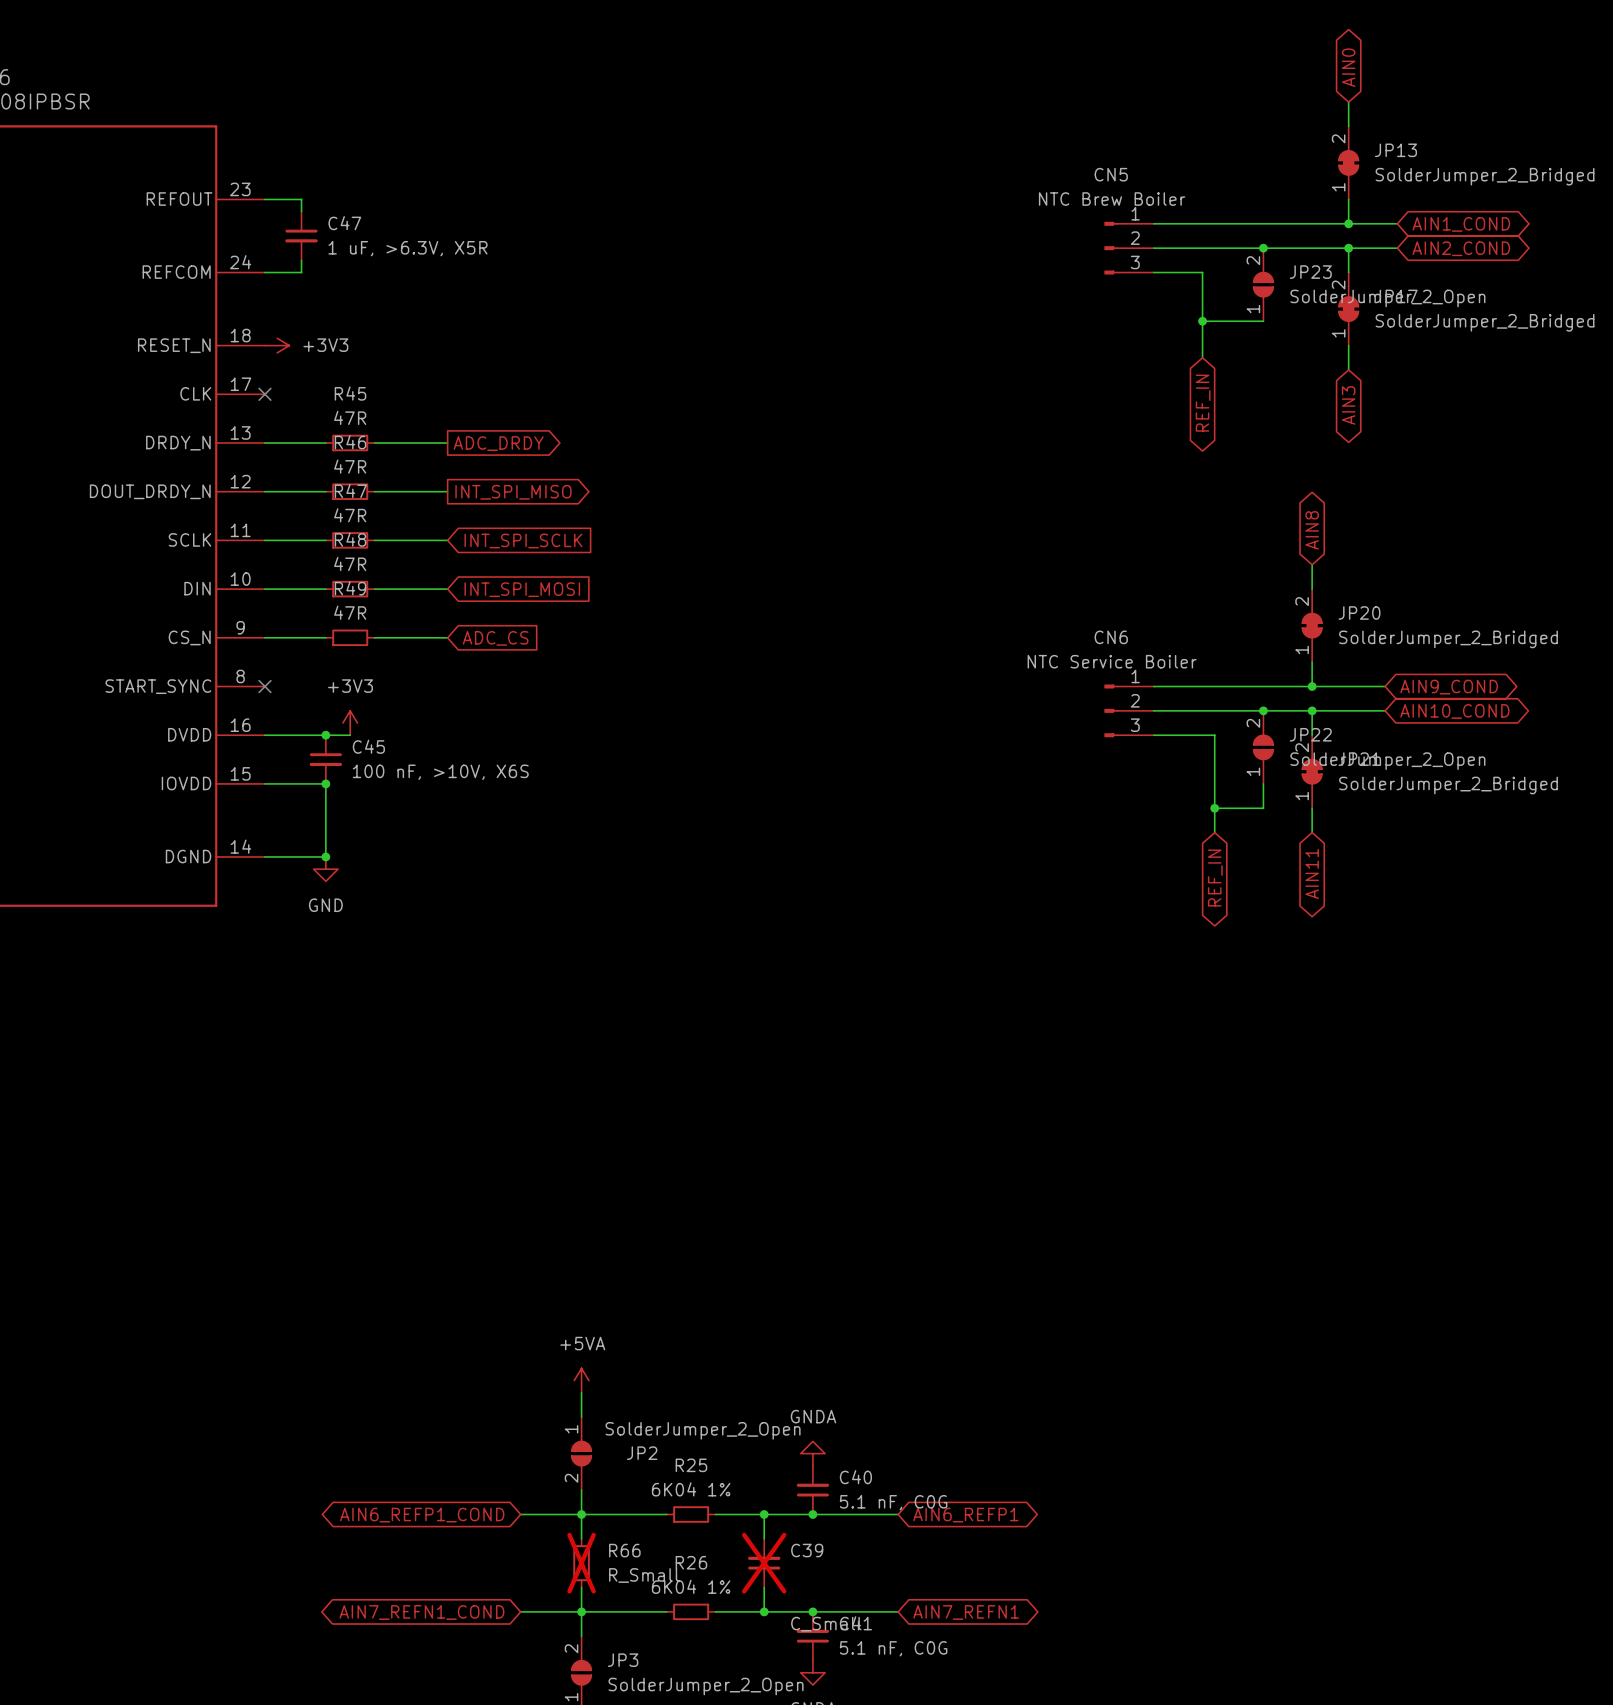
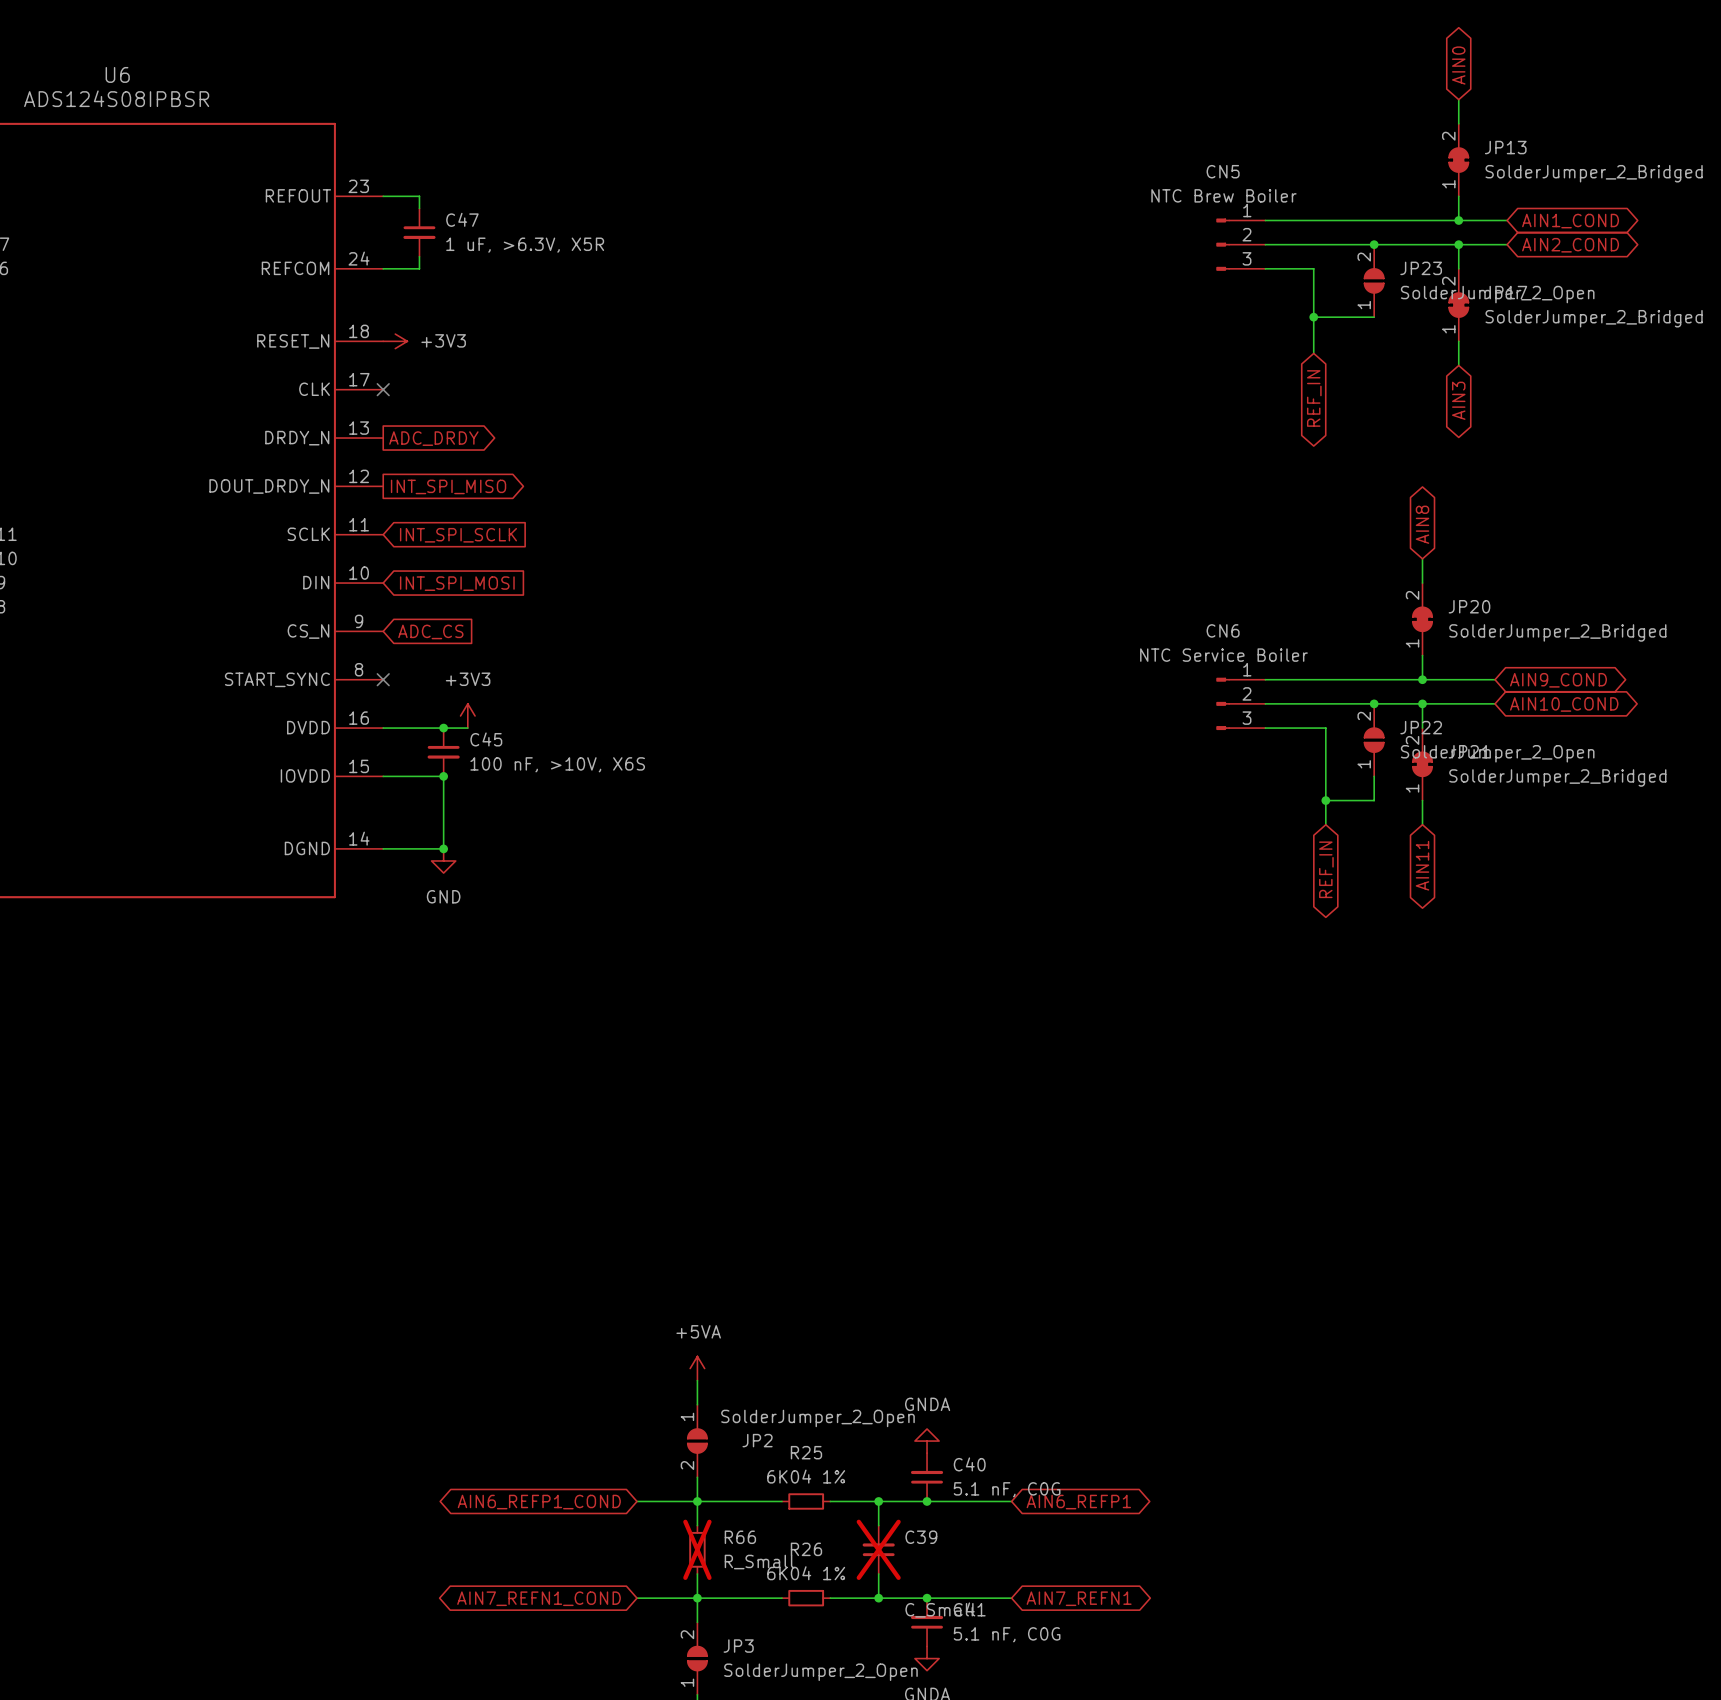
wire: (264, 442) (325, 442) -> none
R45: 47R (350, 442) -> none
wire: (374, 442) (447, 442) -> none
global label position: ADC_DRDY (498, 443) -> ADC_DRDY (433, 438)
wire: (264, 491) (325, 491) -> none
R46: 47R (350, 491) -> none
wire: (374, 491) (447, 491) -> none
global label position: INT_SPI_MISO (513, 492) -> INT_SPI_MISO (448, 486)
wire: (264, 540) (325, 540) -> none
R47: 47R (350, 540) -> none
wire: (374, 540) (447, 540) -> none
global label position: INT_SPI_SCLK (523, 540) -> INT_SPI_SCLK (458, 535)
wire: (264, 589) (325, 589) -> none
R48: 47R (350, 589) -> none
wire: (374, 589) (447, 589) -> none
global label position: INT_SPI_MOSI (522, 589) -> INT_SPI_MOSI (457, 583)
wire: (264, 637) (325, 637) -> none
R49: 47R (350, 637) -> none
wire: (374, 637) (447, 637) -> none
global label position: ADC_CS (495, 638) -> ADC_CS (430, 631)

